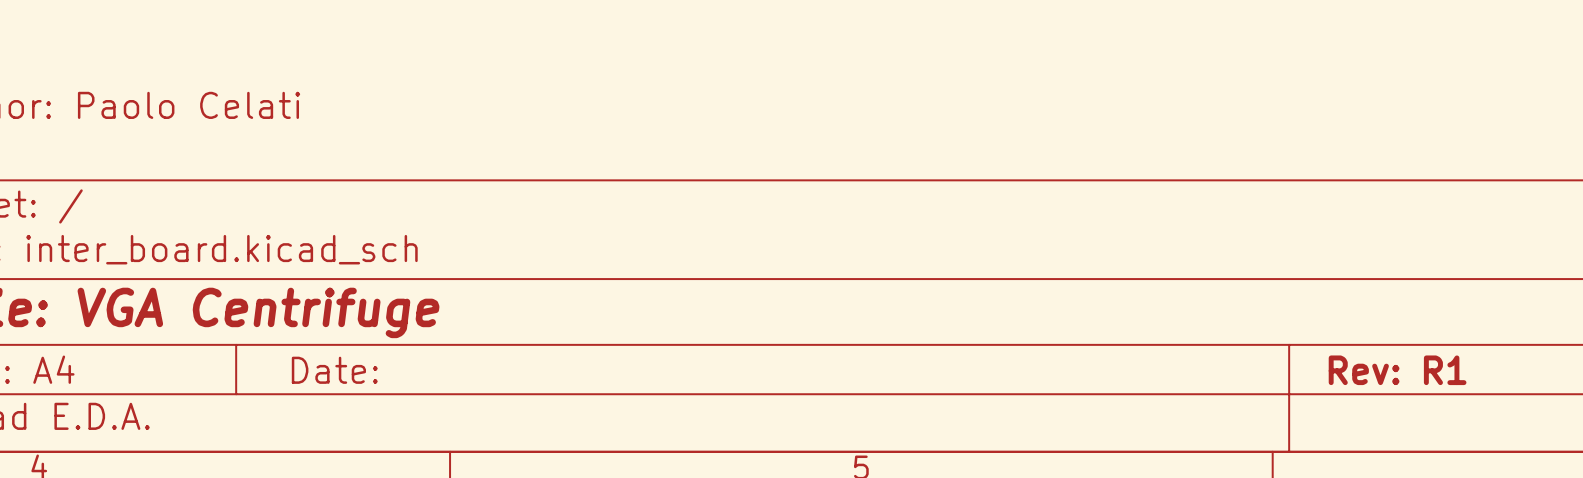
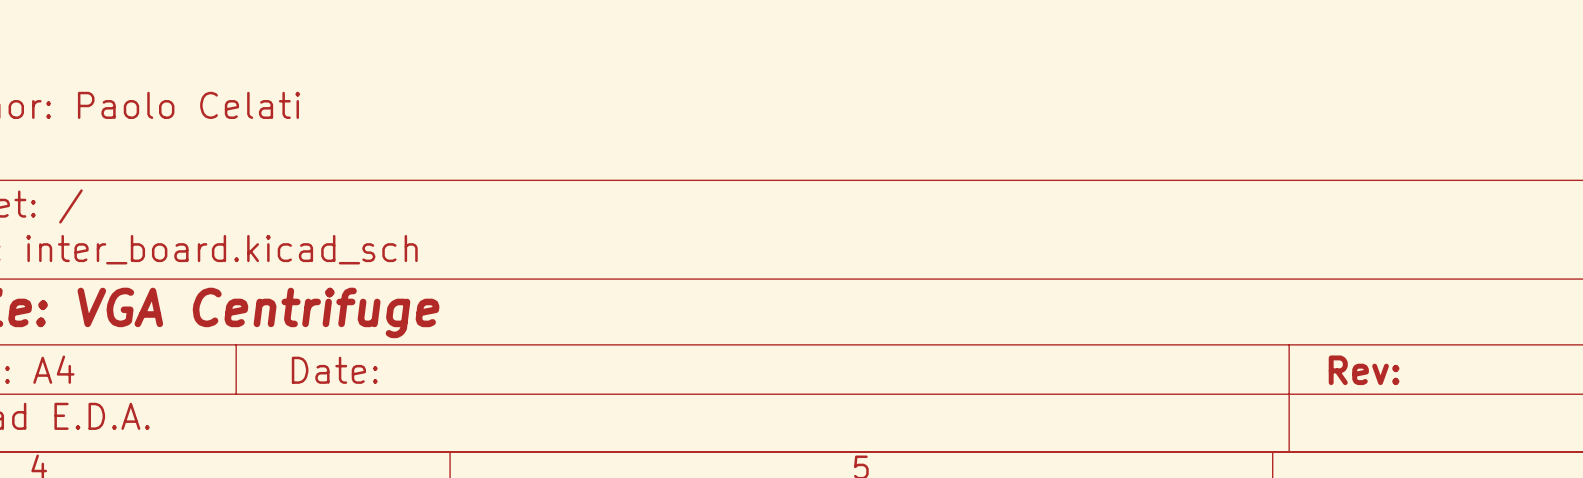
title block: Rev: R1 (1397, 370) -> Rev: (1364, 370)

